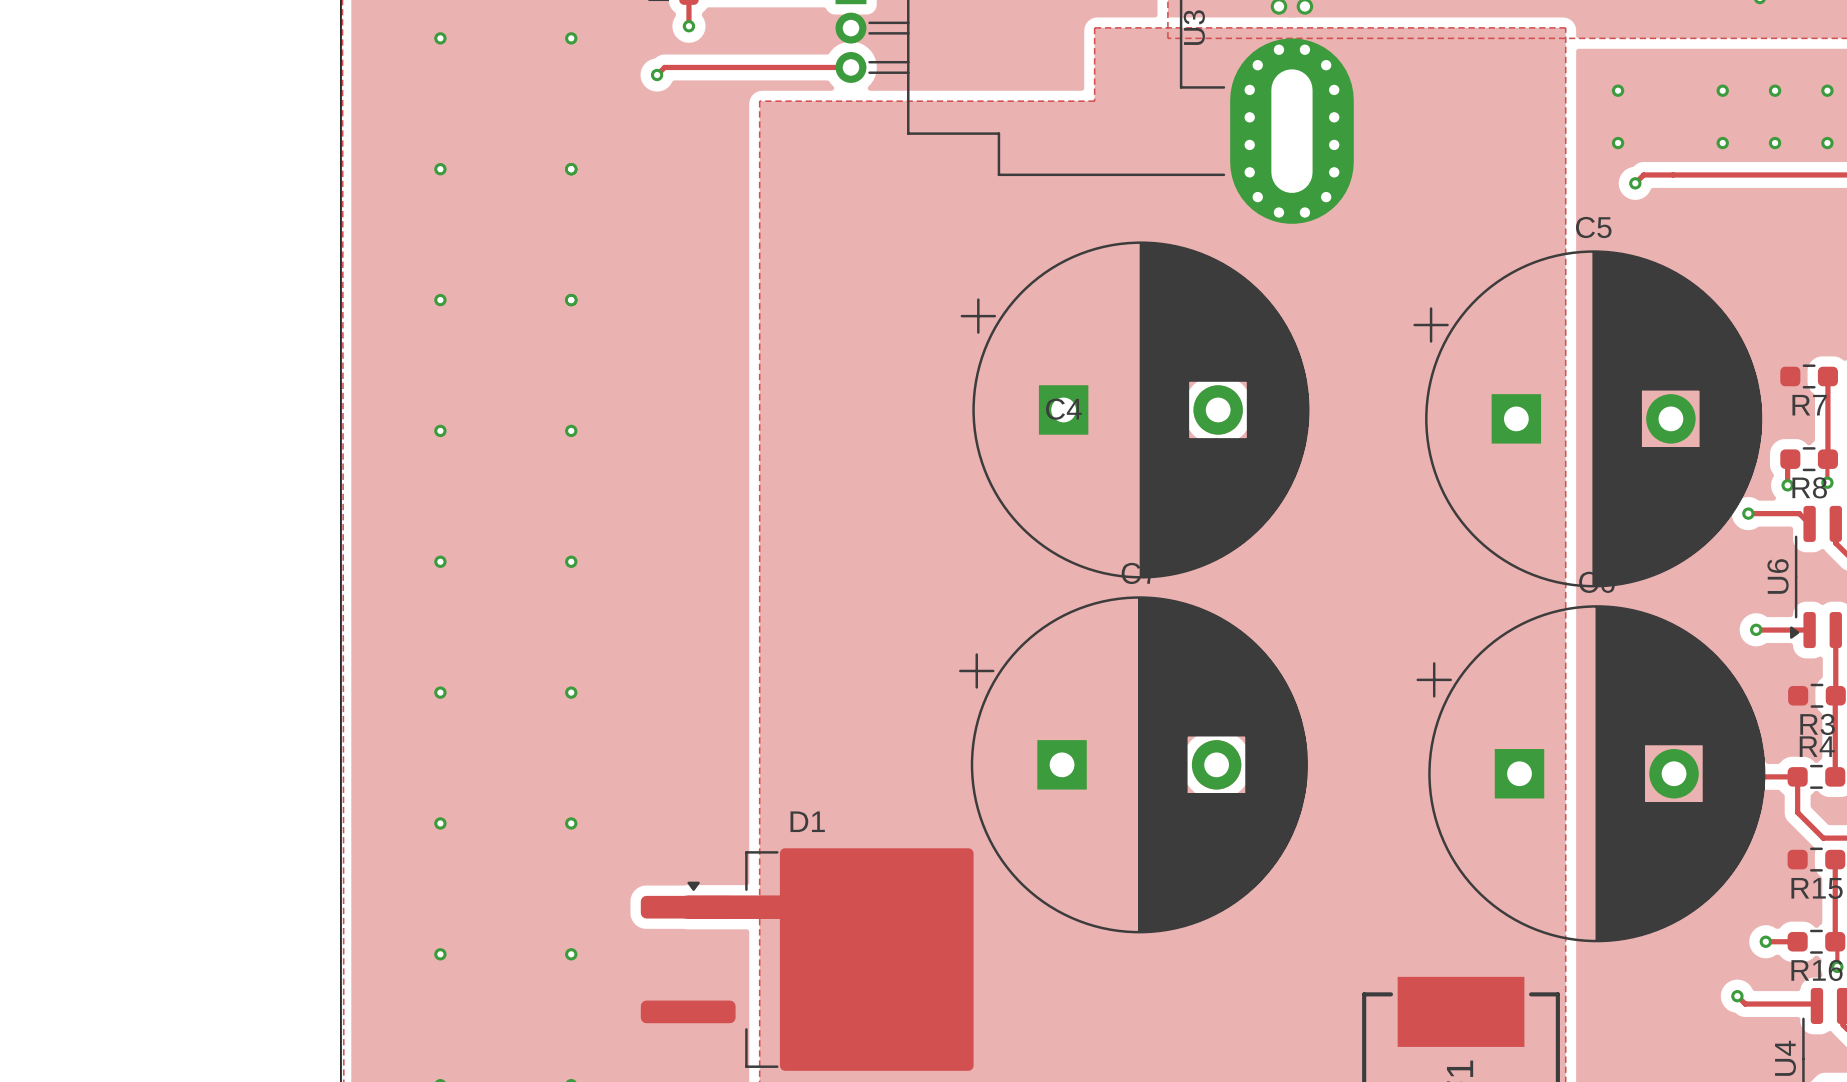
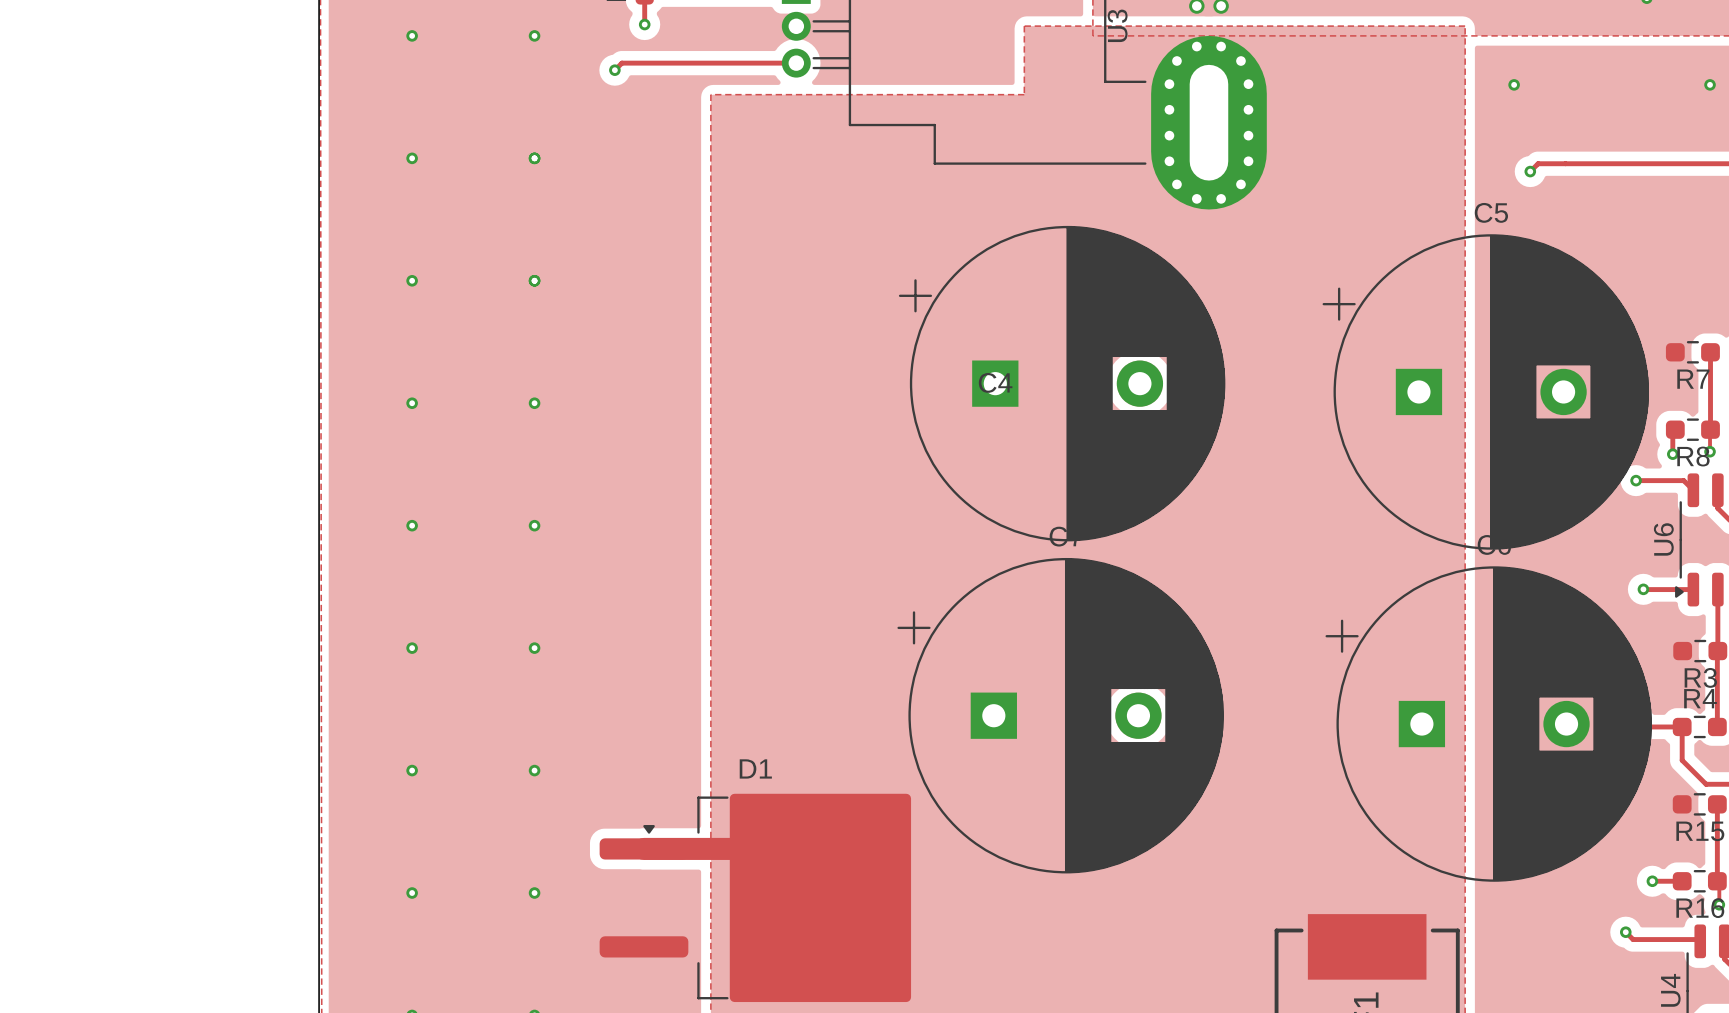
via: (1722, 90) -> none
via: (1775, 90) -> none
via: (1618, 143) -> none
via: (1722, 143) -> none
via: (1775, 143) -> none
via: (1827, 143) -> none

